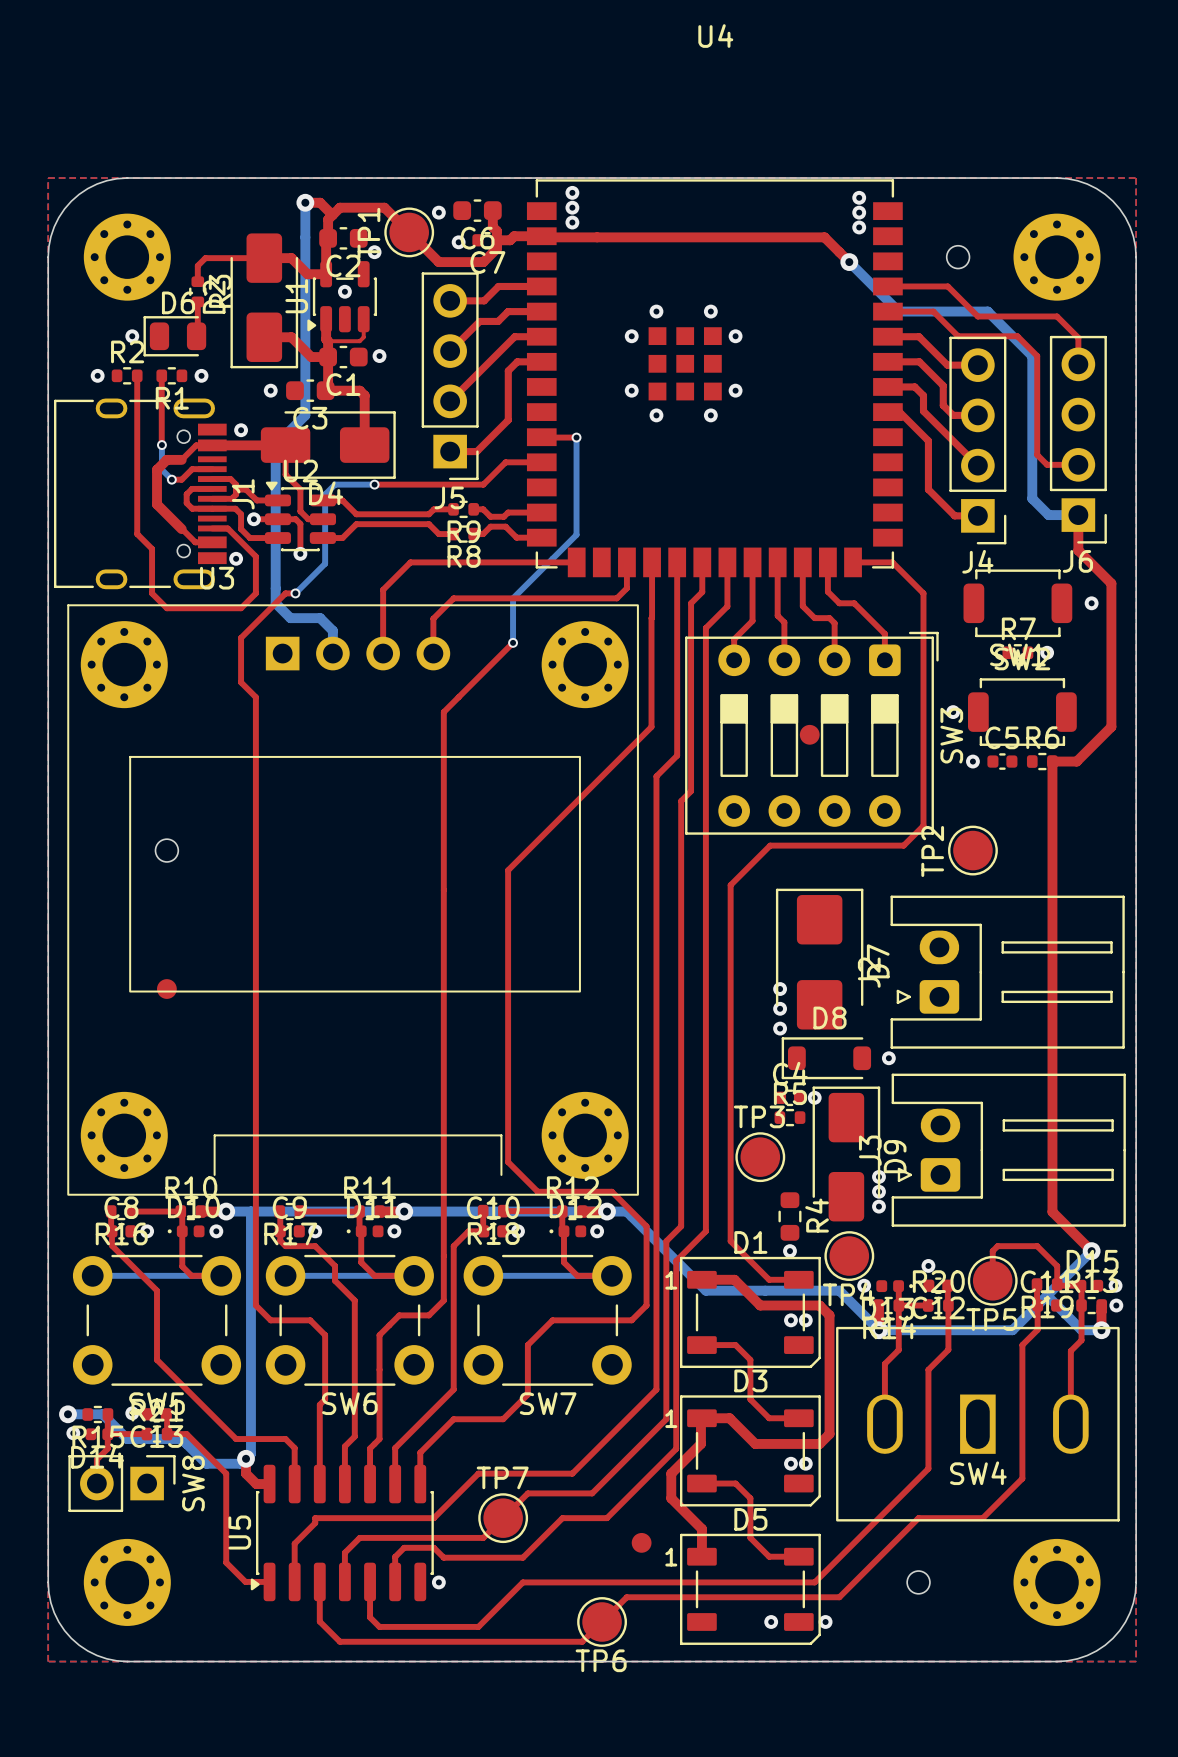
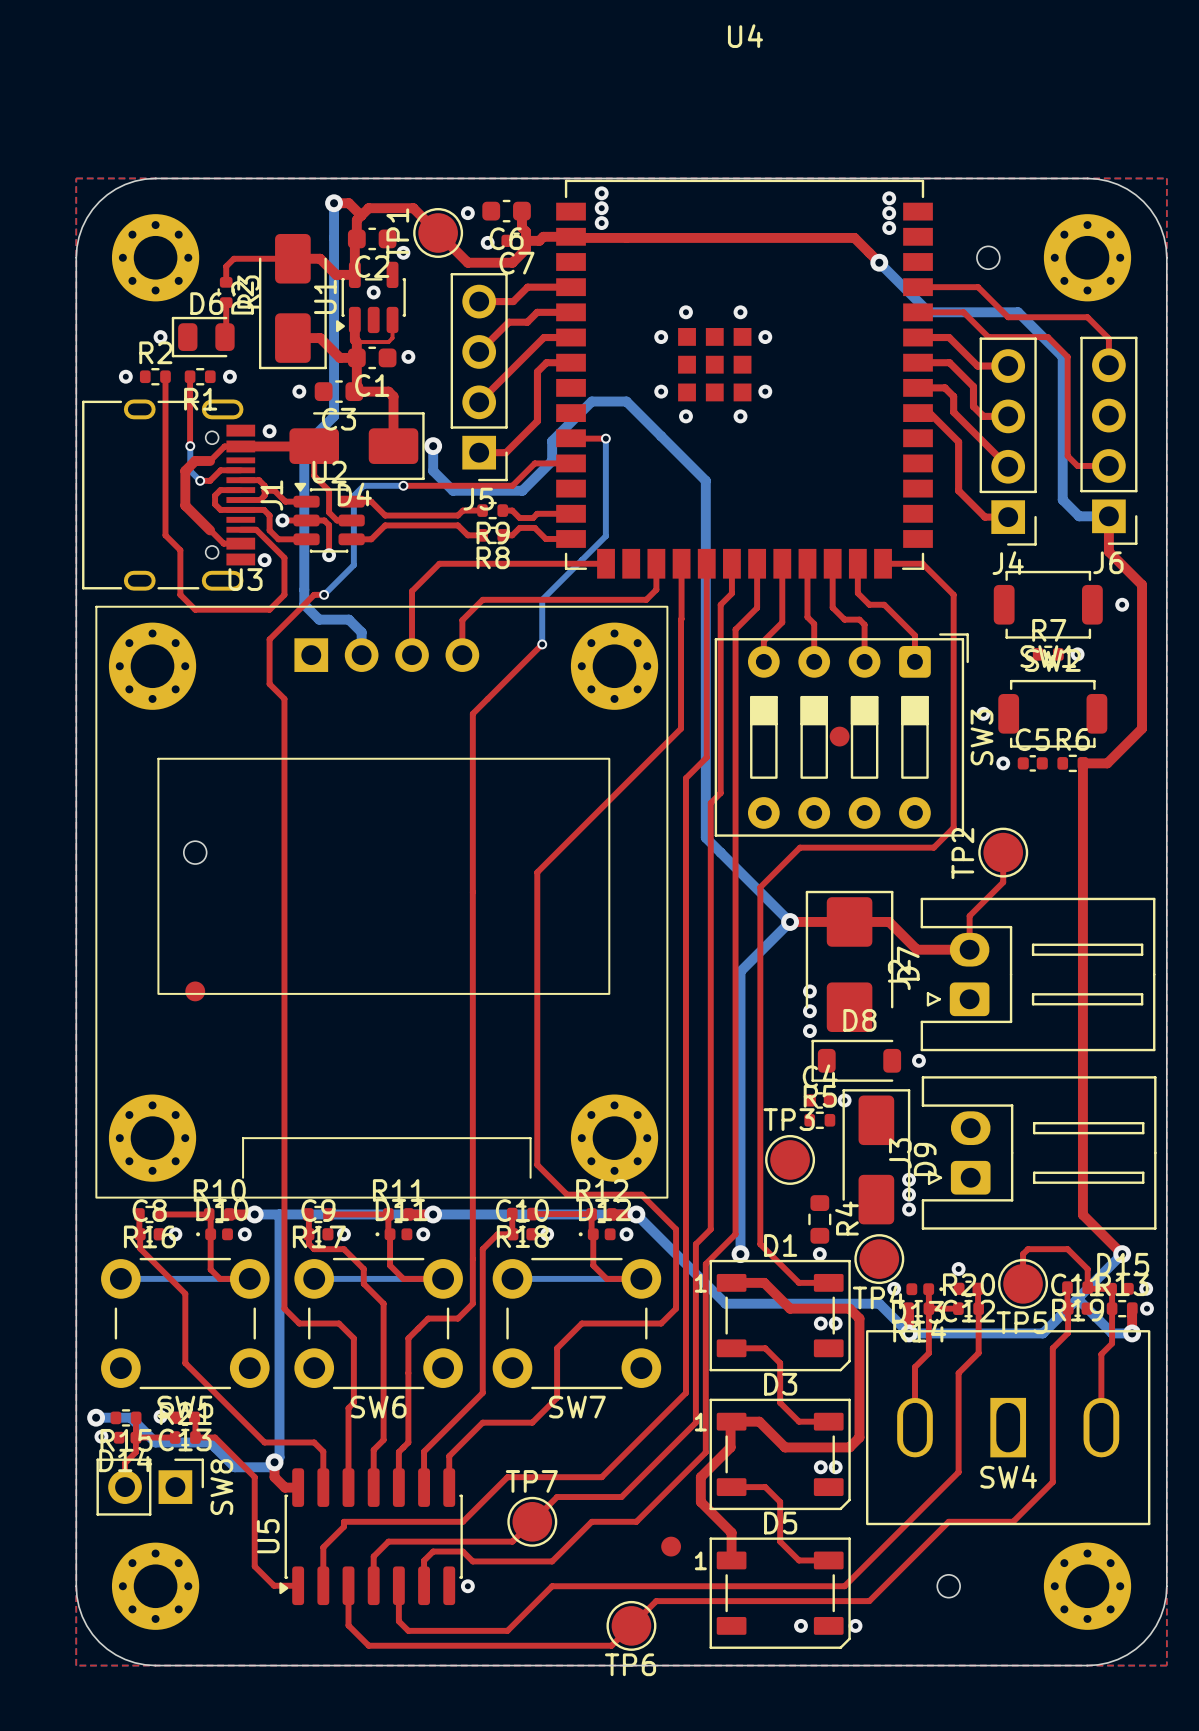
bottom track: none -> (433, 446) (433, 470) (453, 490) (522, 490) (552, 461) (552, 441) (591, 401) (626, 401) (705, 480) (705, 837) (790, 922) (740, 971) (740, 1254)
via: none -> (433, 446)
top track: none -> (1003, 852) (1003, 882) (969, 915) (969, 949) (916, 949) (889, 921) (790, 921)
via: none -> (790, 922)
bottom track: (607, 1211) (626, 1211) (705, 1290) (839, 1290) (849, 1300) -> (636, 1214) (725, 1303) (879, 1303)
via: none -> (740, 1254)

